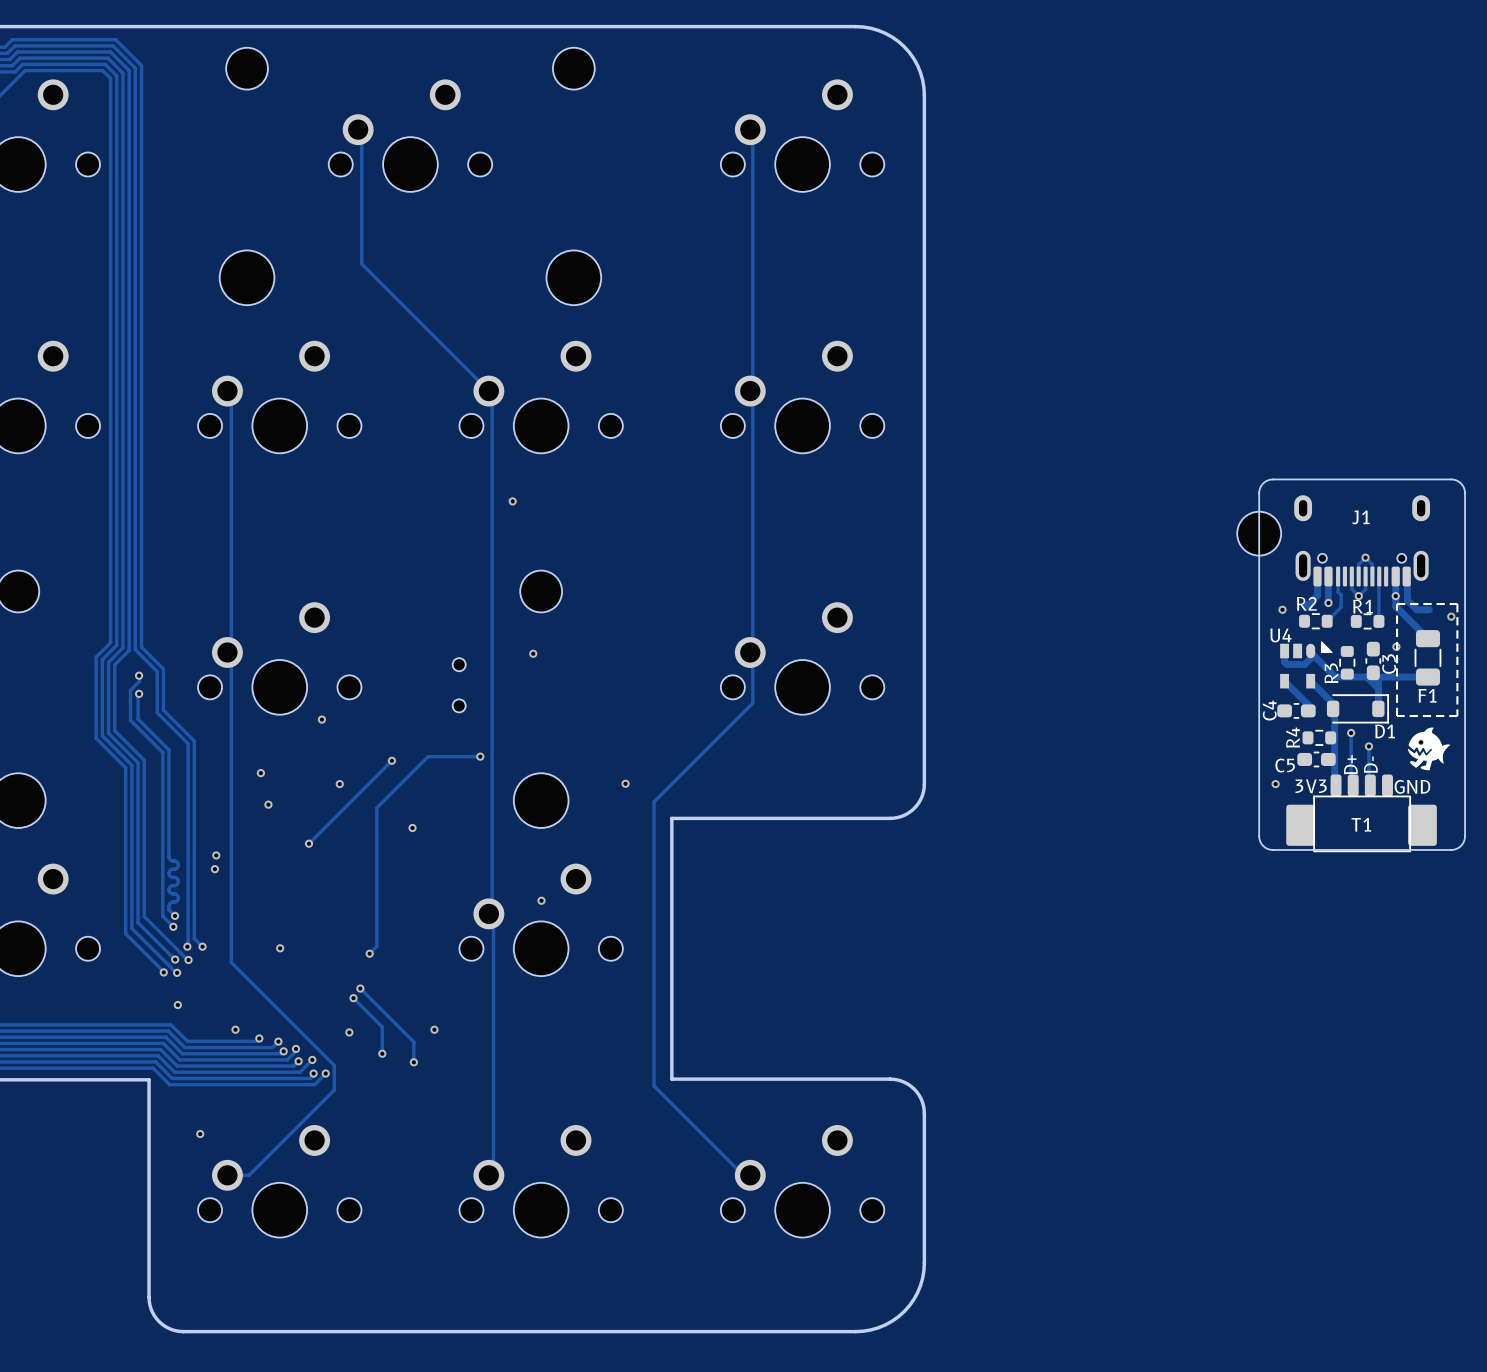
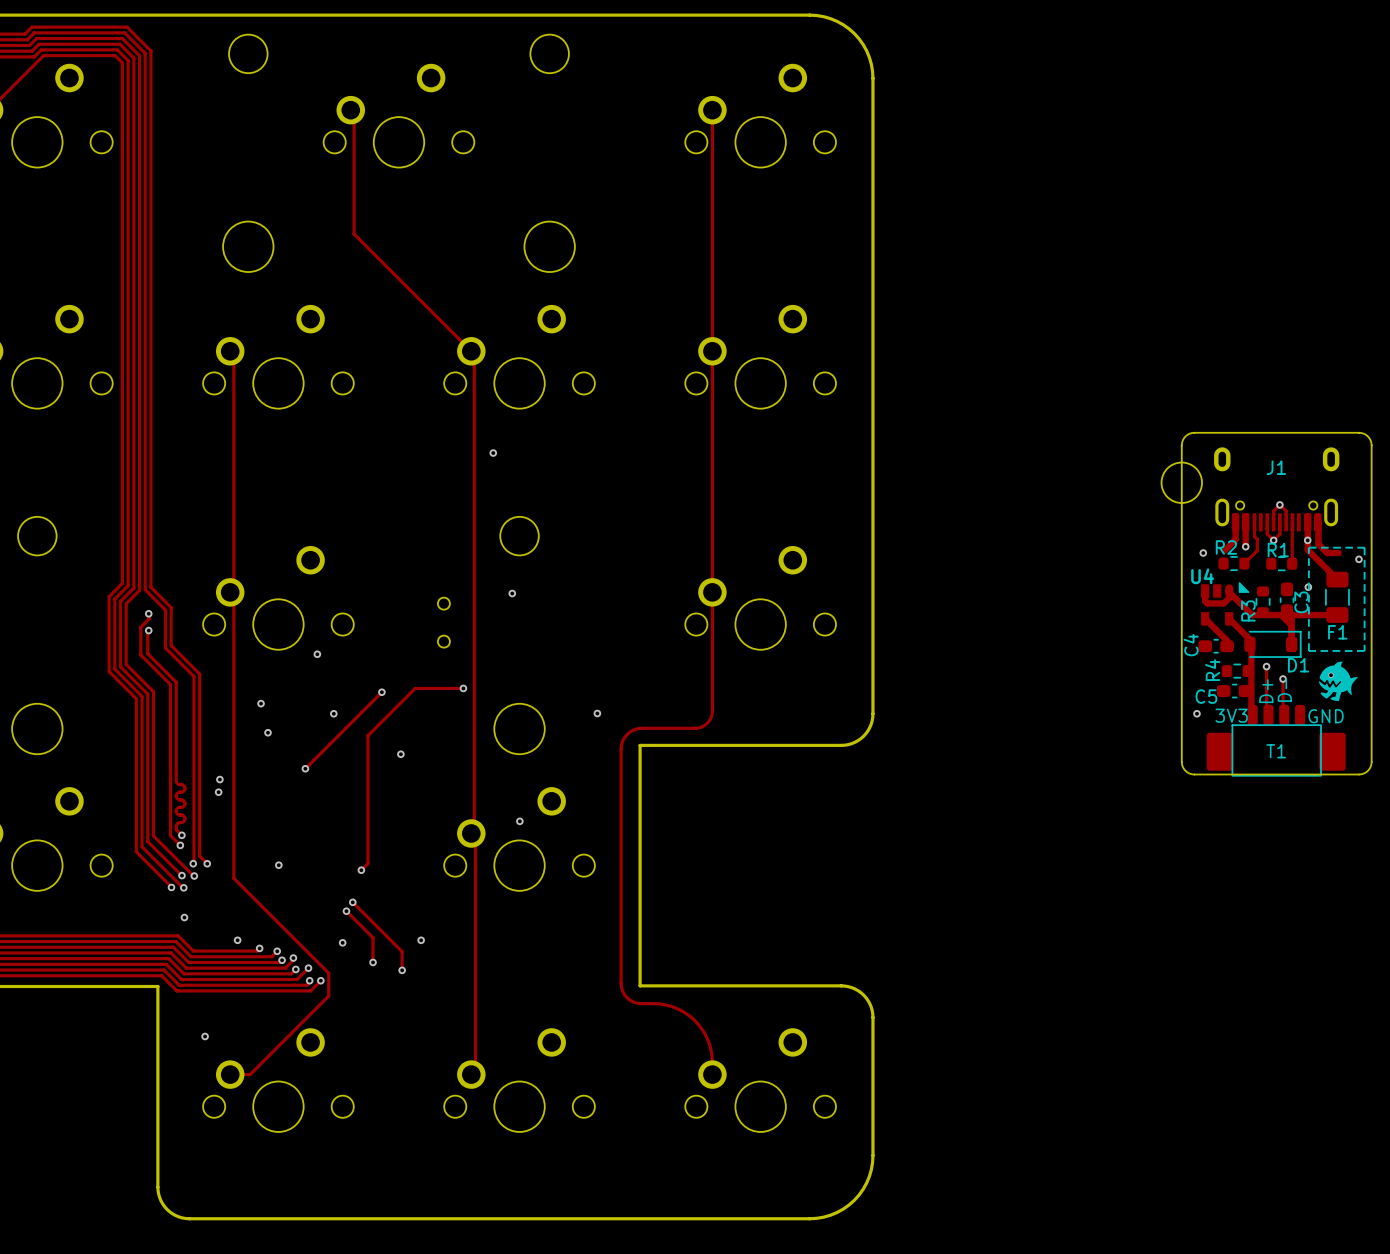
track: (750, 129) (752, 132) (752, 388) (750, 391) (752, 393) (752, 649) (750, 652) (752, 655) (752, 703) (654, 801) (654, 1085) (743, 1175) (750, 1175) -> (712, 110) (712, 712) (708, 721) (698, 727) (634, 729) (625, 736) (621, 749) (621, 987) (625, 995) (632, 1001) (672, 1006) (695, 1020) (709, 1043) (712, 1056) (712, 1074)

